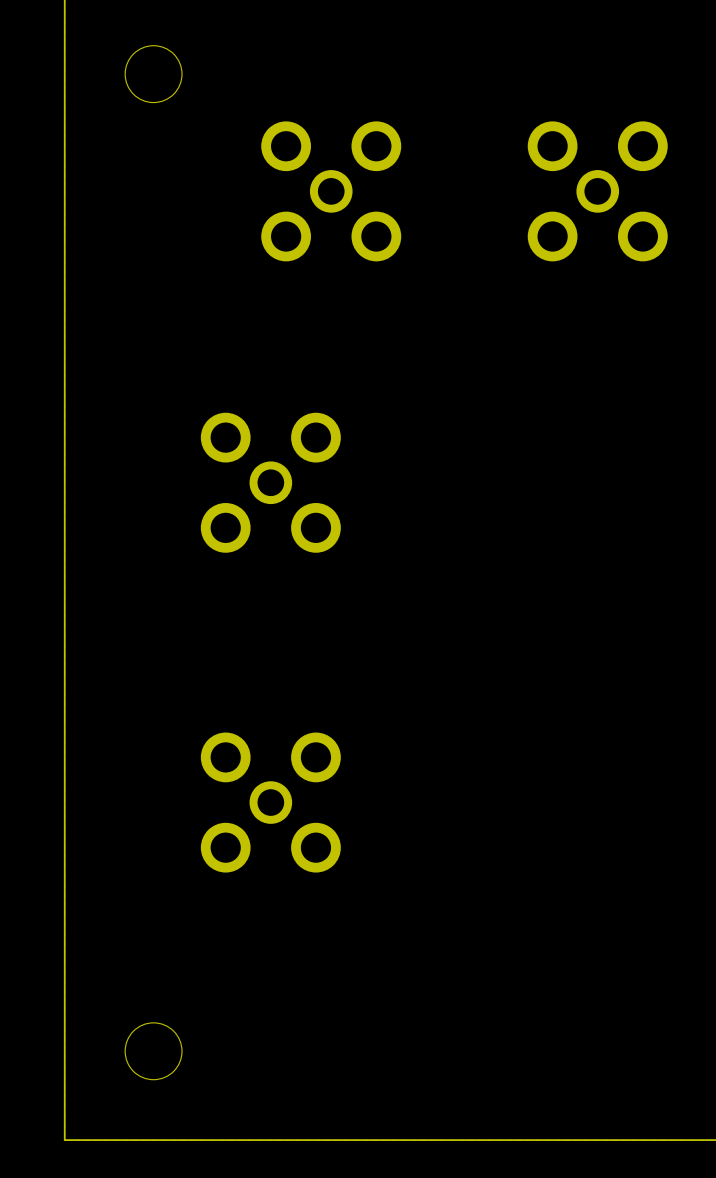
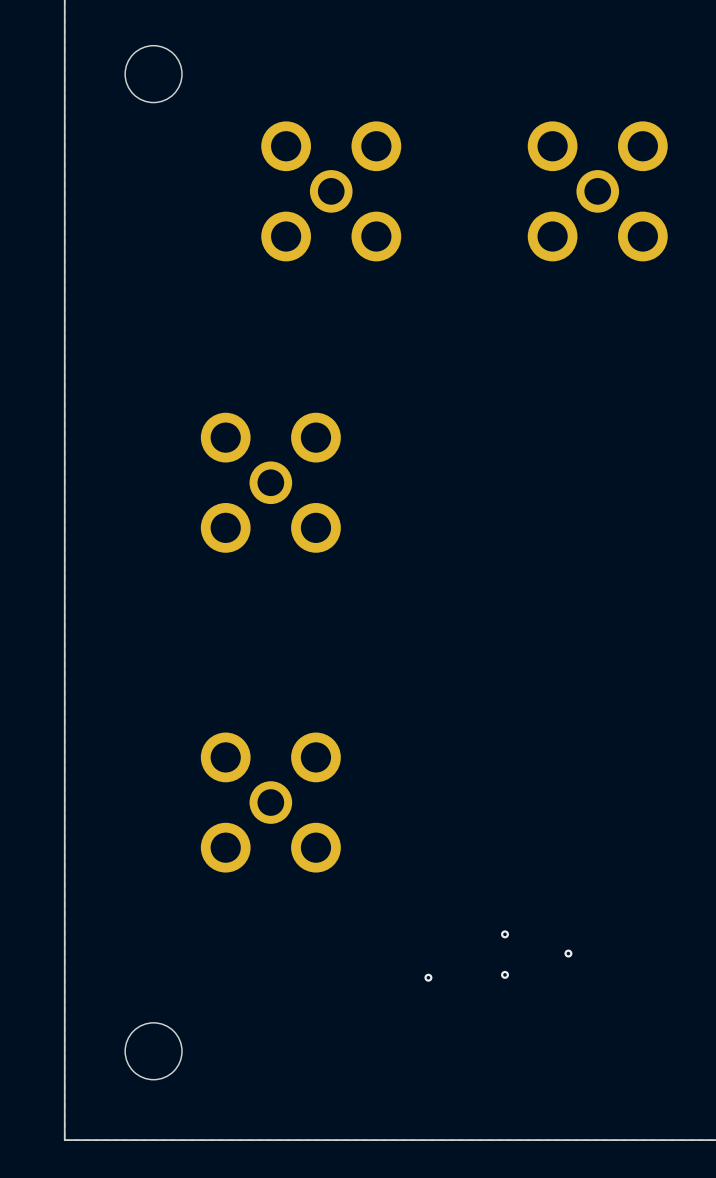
via: none -> (505, 934)
via: none -> (568, 953)
via: none -> (505, 974)
via: none -> (428, 977)

